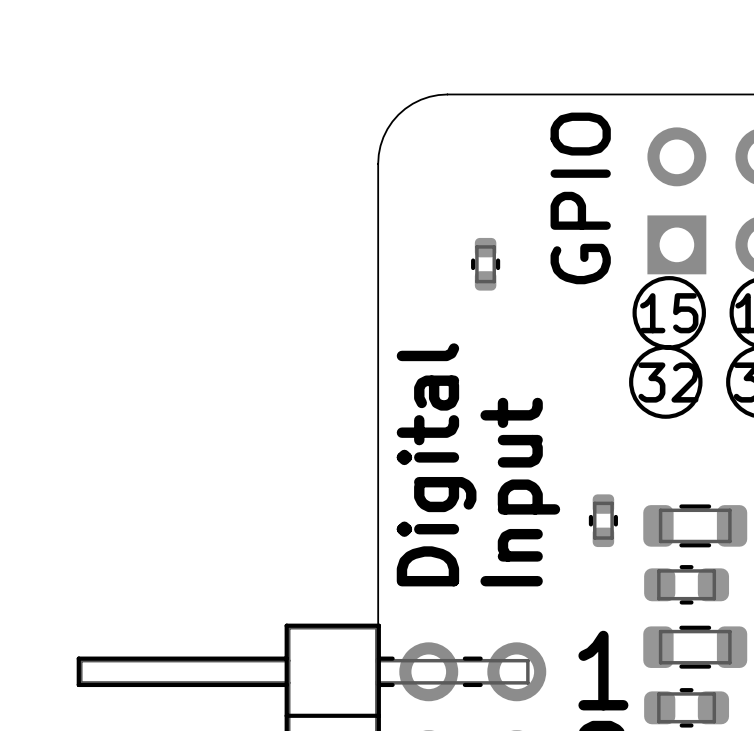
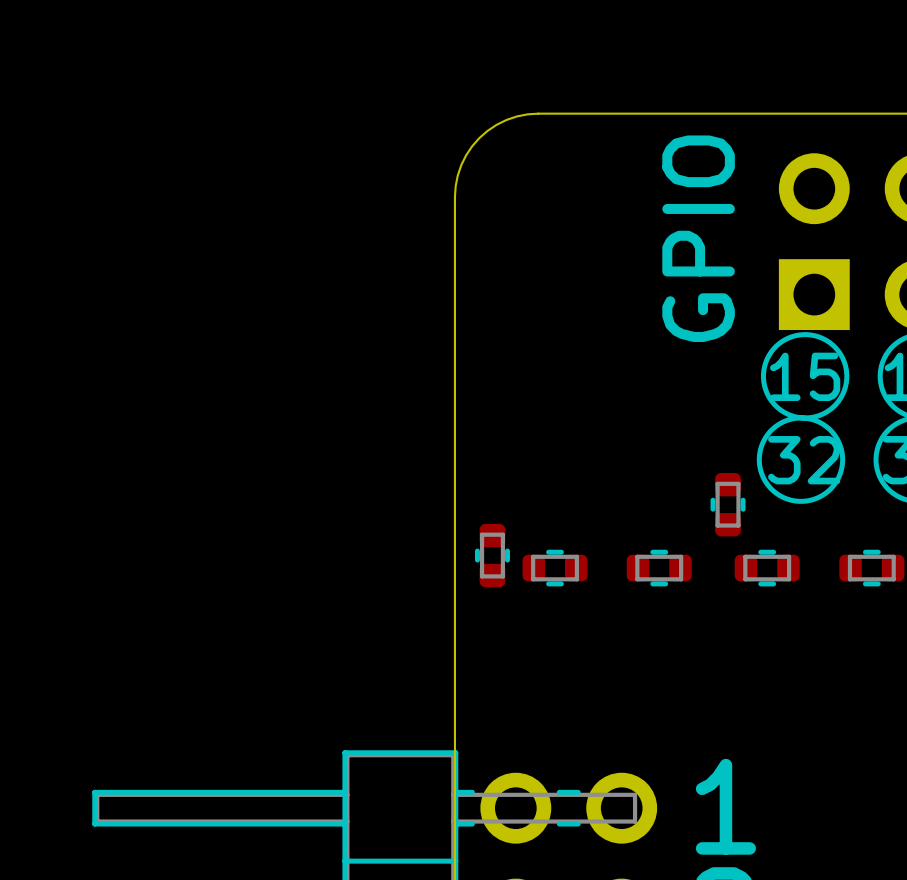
part: (485, 264) -> none
part: none -> (728, 504)
part: none -> (492, 555)
text: Digital (436, 464) -> none
part: none -> (555, 568)
part: none -> (659, 568)
part: none -> (767, 568)
part: none -> (871, 568)
text: Input (520, 492) -> none
part: (603, 520) -> none
part: (695, 525) -> none
part: (686, 584) -> none
part: (695, 647) -> none
part: (686, 707) -> none

